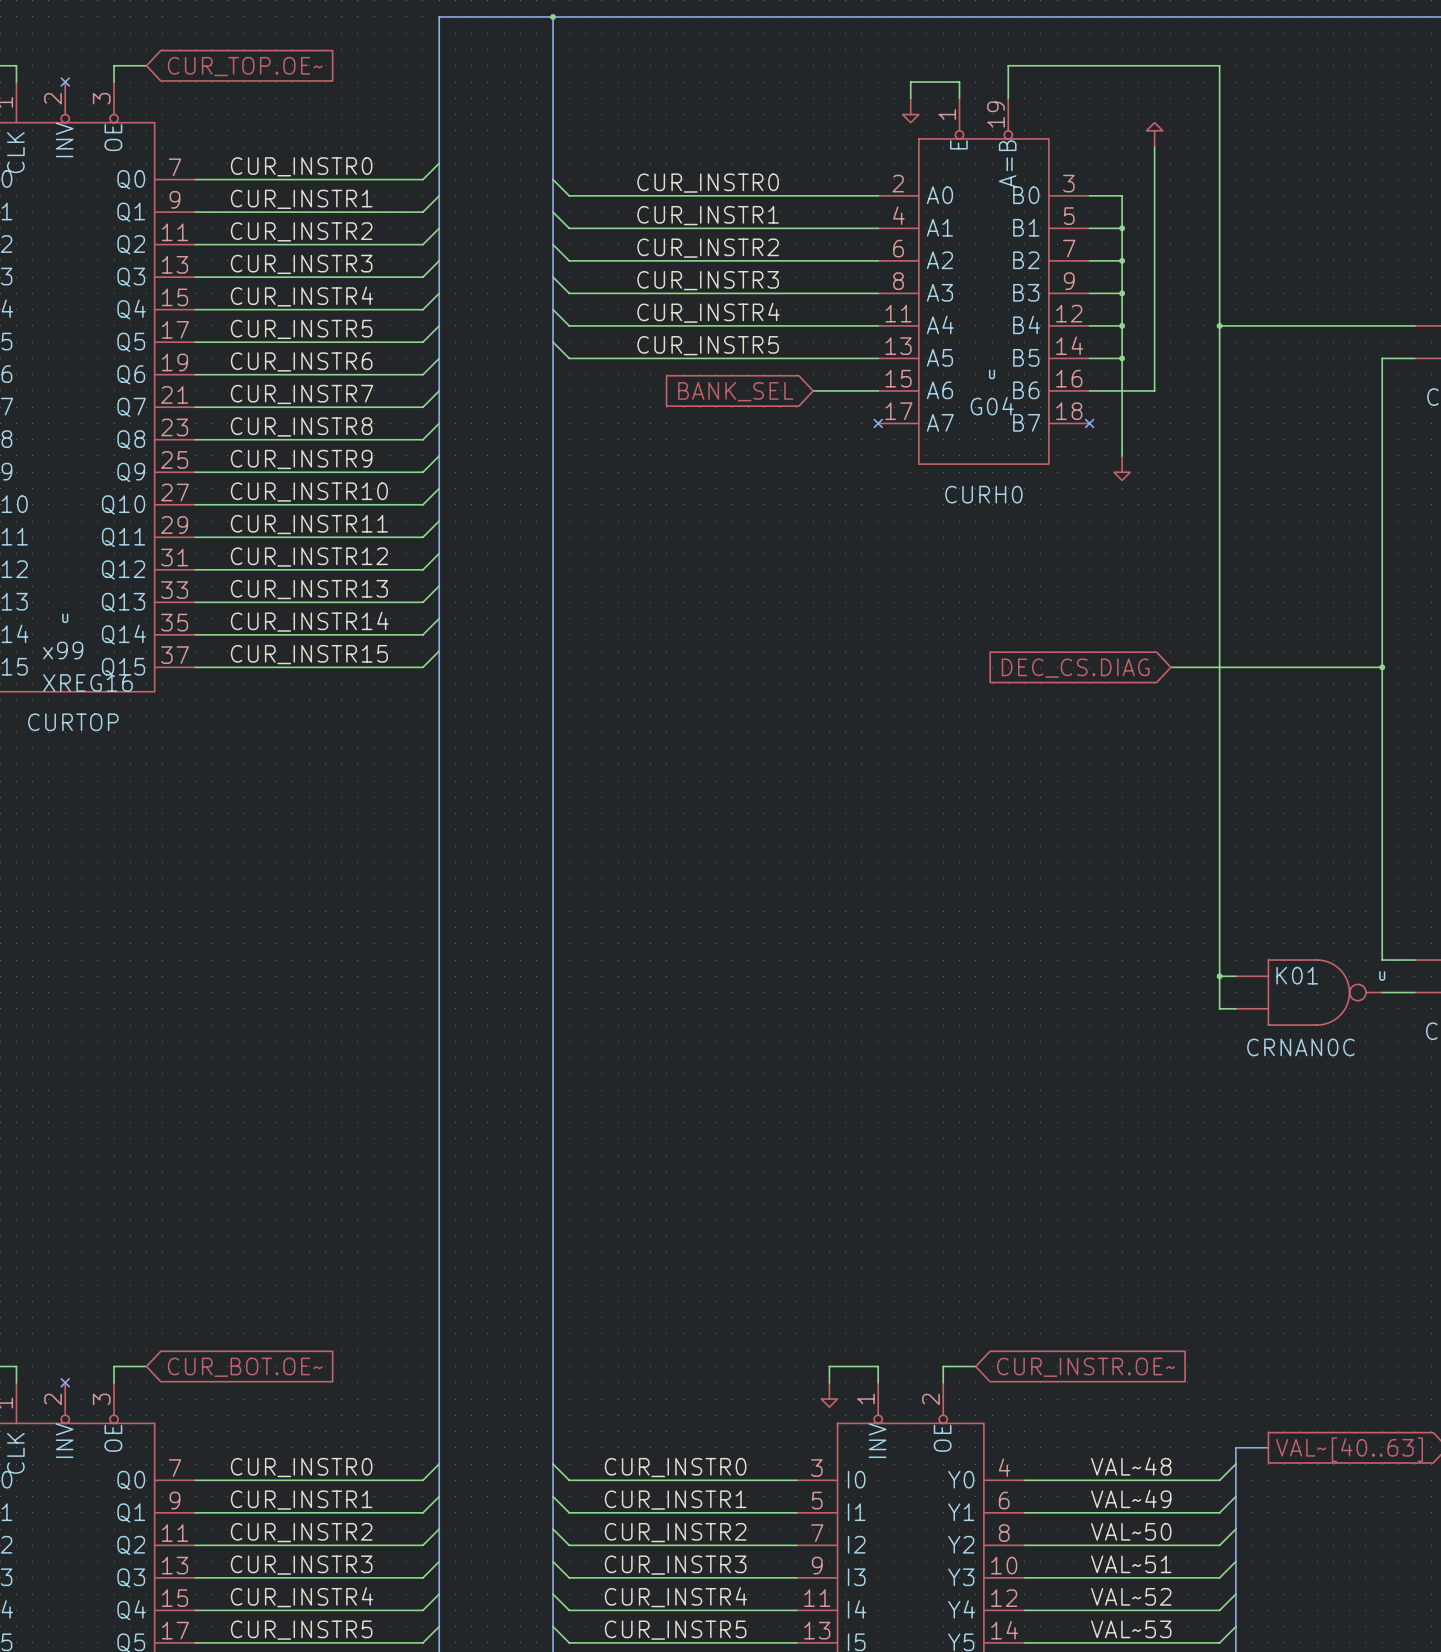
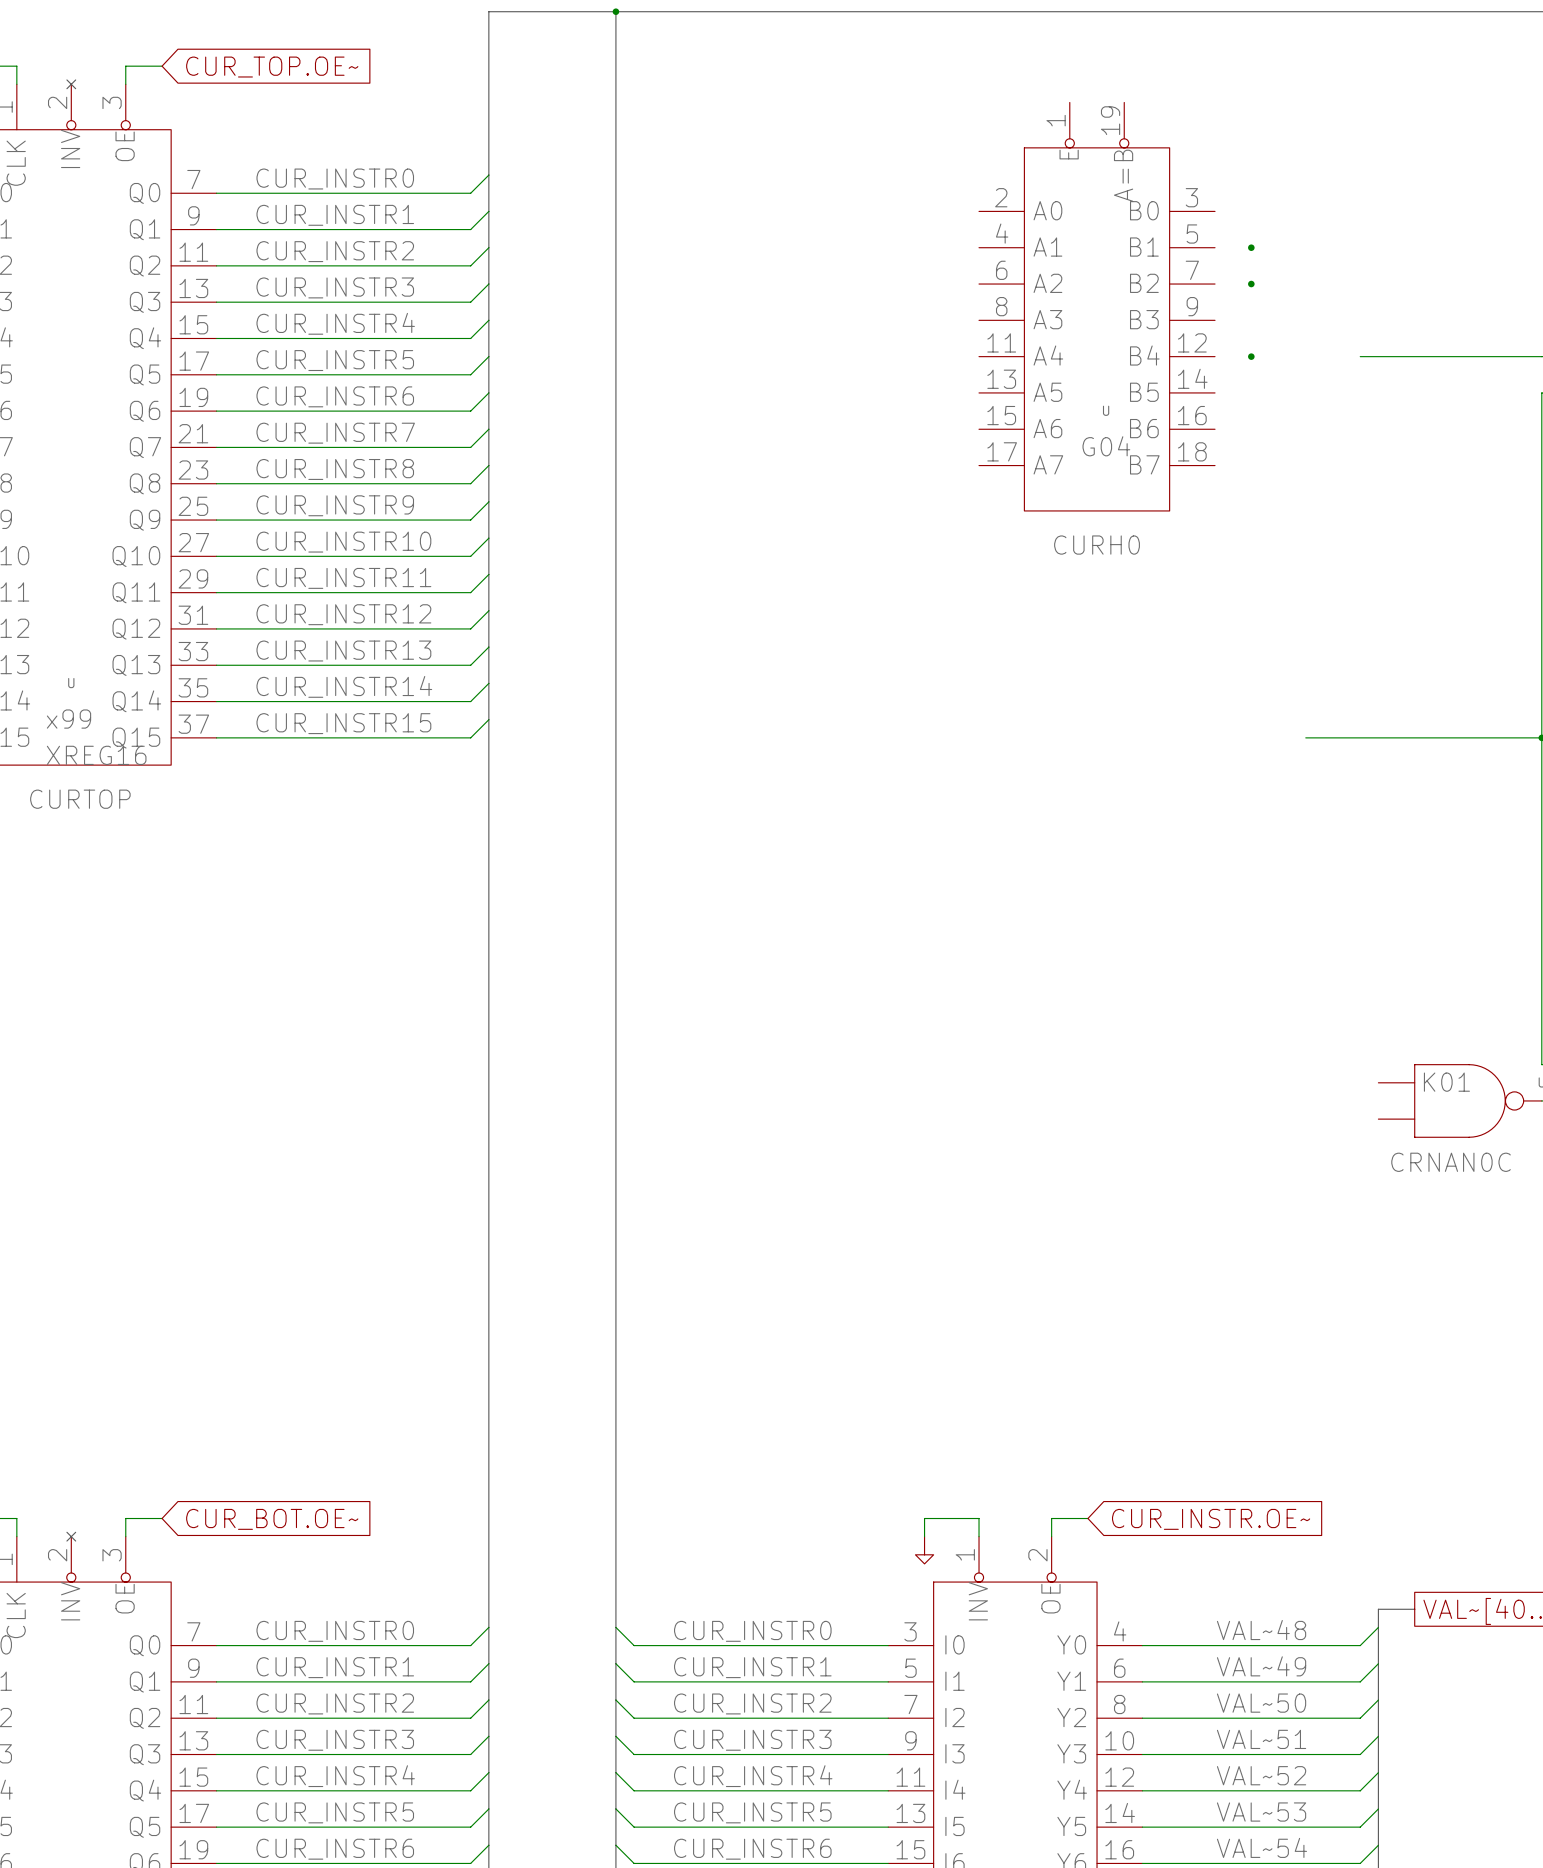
wire: (910, 98) (910, 82) (959, 82) (959, 98) -> none
wire: (1008, 98) (1008, 65) (1219, 65) (1219, 1008) (1235, 1008) -> none
power symbol: (910, 110) -> none
power symbol: (1154, 134) -> none
wire: (1154, 147) (1154, 390) (1089, 390) -> none
wire: (553, 179) (569, 195) (878, 195) -> none
label: CUR_INSTR0 (708, 183) -> none
wire: (1089, 195) (1122, 195) (1122, 455) -> none
wire: (553, 212) (569, 228) (878, 228) -> none
label: CUR_INSTR1 (708, 215) -> none
wire: (1089, 228) (1122, 228) -> none
wire: (553, 244) (569, 260) (878, 260) -> none
label: CUR_INSTR2 (708, 248) -> none
wire: (1089, 260) (1122, 260) -> none
wire: (553, 277) (569, 293) (878, 293) -> none
label: CUR_INSTR3 (708, 280) -> none
wire: (1089, 293) (1122, 293) -> none
junction: (1122, 293) -> none
wire: (553, 309) (569, 325) (878, 325) -> none
label: CUR_INSTR4 (708, 312) -> none
wire: (1089, 325) (1122, 325) -> none
junction: (1219, 325) -> none
wire: (553, 342) (569, 358) (878, 358) -> none
label: CUR_INSTR5 (708, 345) -> none
wire: (1089, 358) (1122, 358) -> none
junction: (1122, 358) -> none
wire: (813, 390) (878, 390) -> none
global label: BANK_SEL (735, 391) -> none
no-connect mark: (878, 423) -> none
no-connect mark: (1089, 423) -> none
power symbol: (1122, 468) -> none
global label: DEC_CS.DIAG (1075, 668) -> none
wire: (1219, 976) (1235, 976) -> none
junction: (1219, 976) -> none

